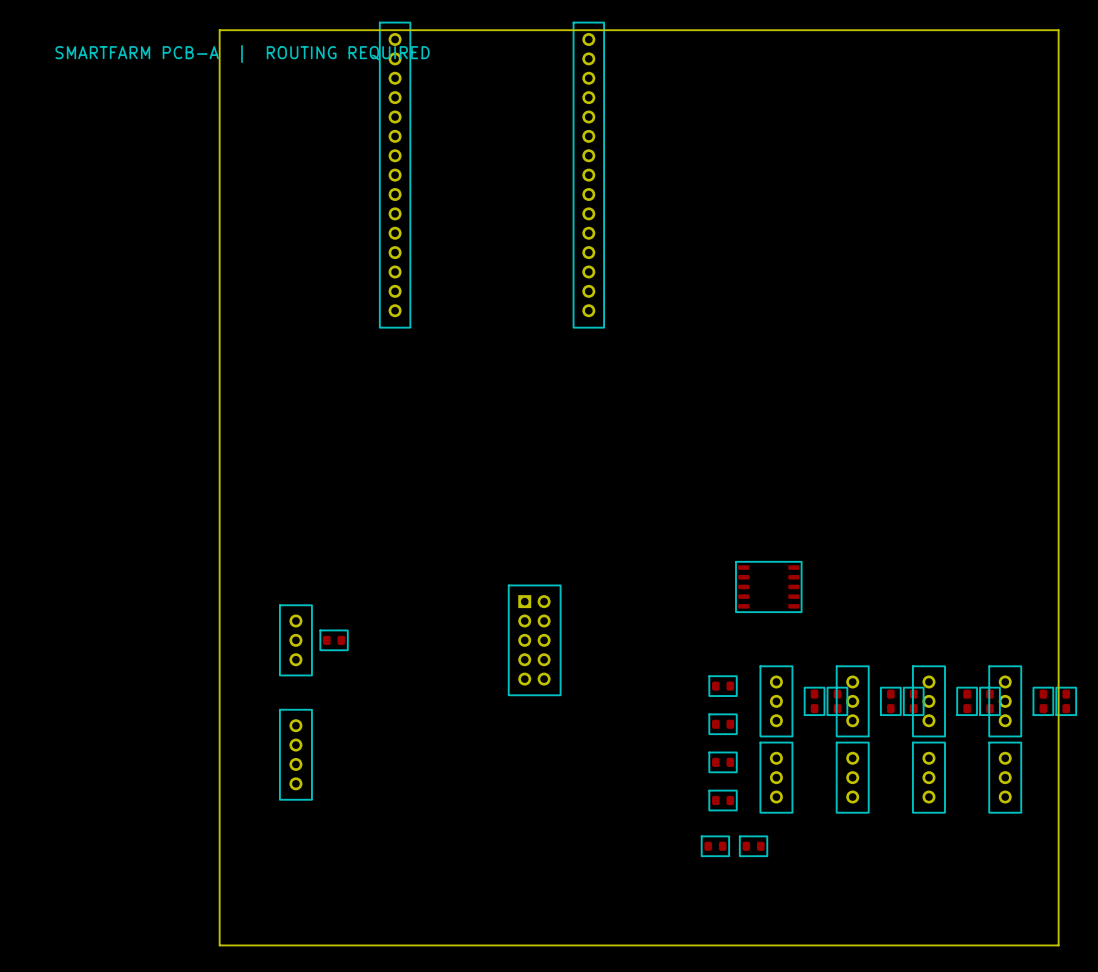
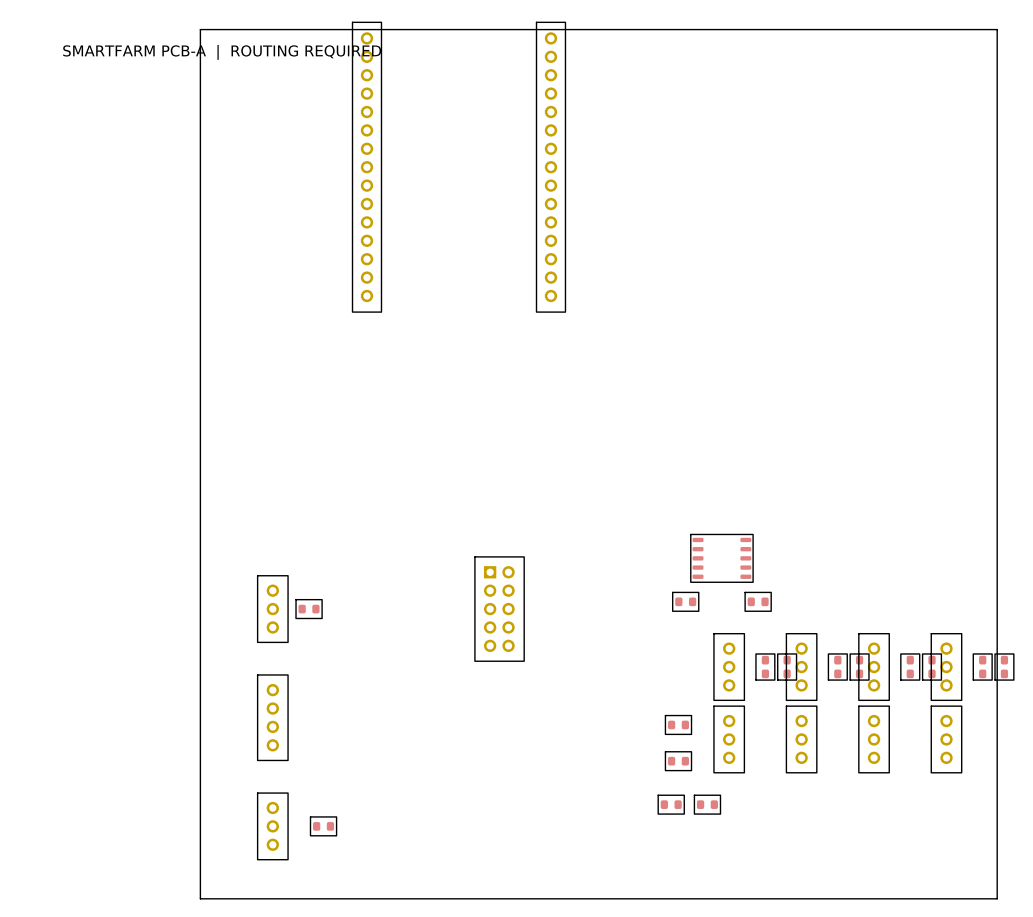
part: none -> (685, 601)
part: none -> (758, 601)
part: (723, 686) -> none
part: (723, 724) -> none
part: none -> (272, 826)
part: none -> (323, 826)

